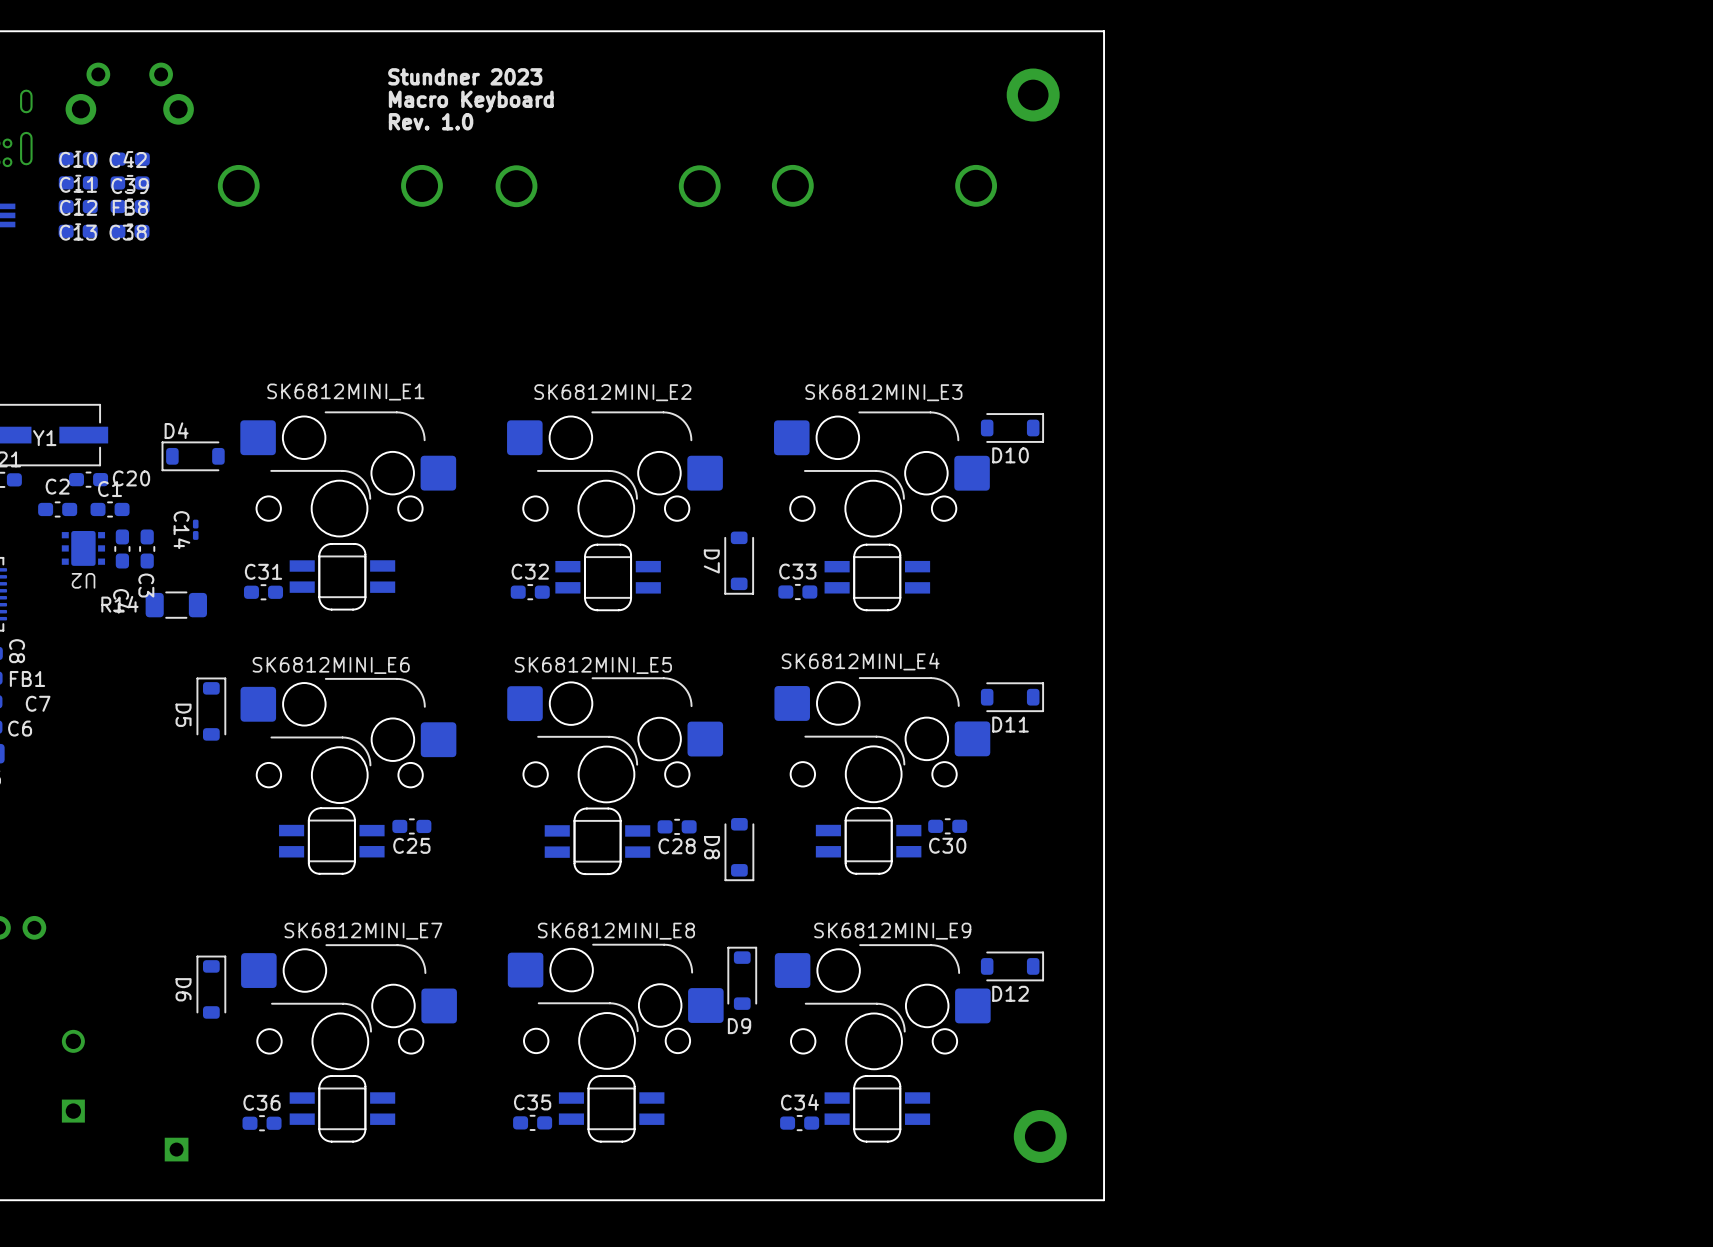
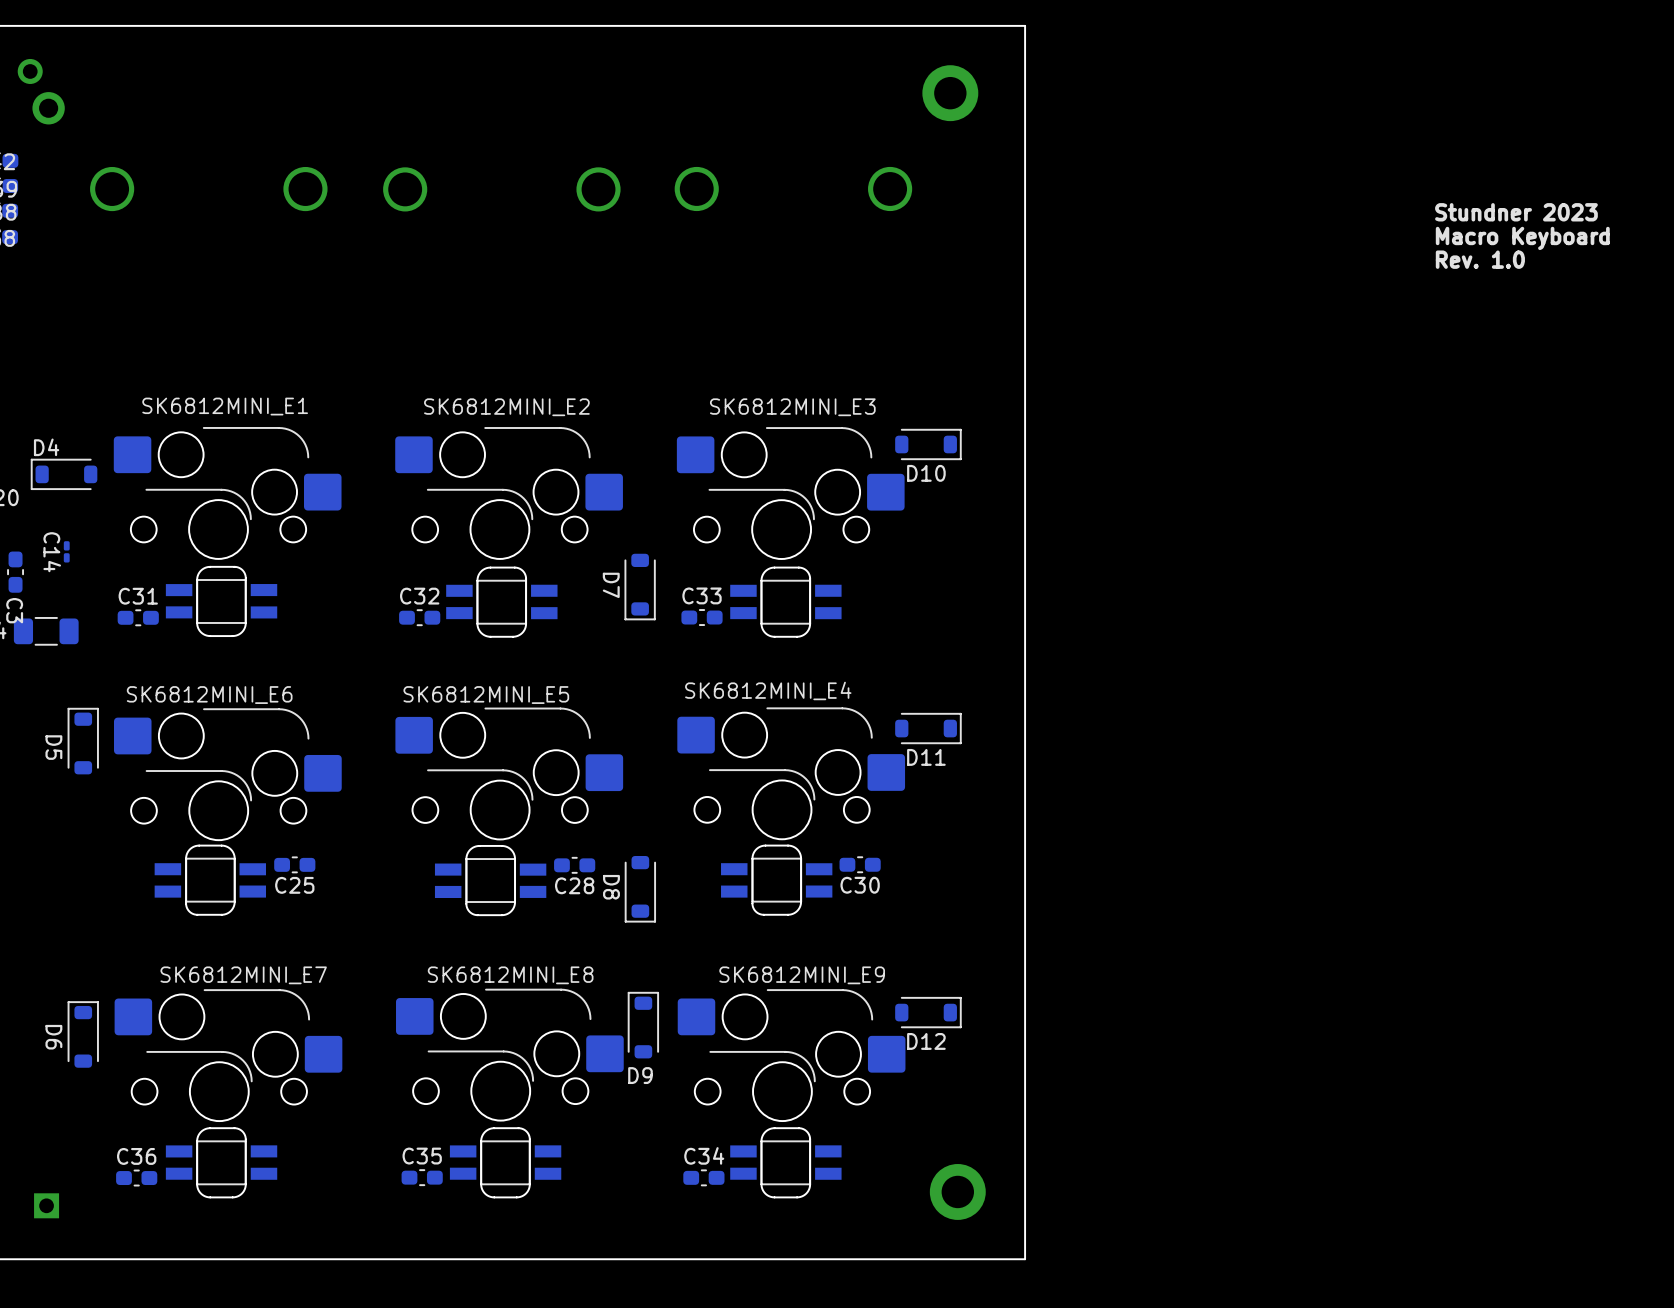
text: Stundner 2023 (465, 76) -> none
text: Macro Keyboard (471, 101) -> none
text: Rev. 1.0 (431, 121) -> none
text: none -> Stundner 2023 (1516, 212)
text: none -> Macro Keyboard (1522, 238)
text: none -> Rev. 1.0 (1480, 259)

